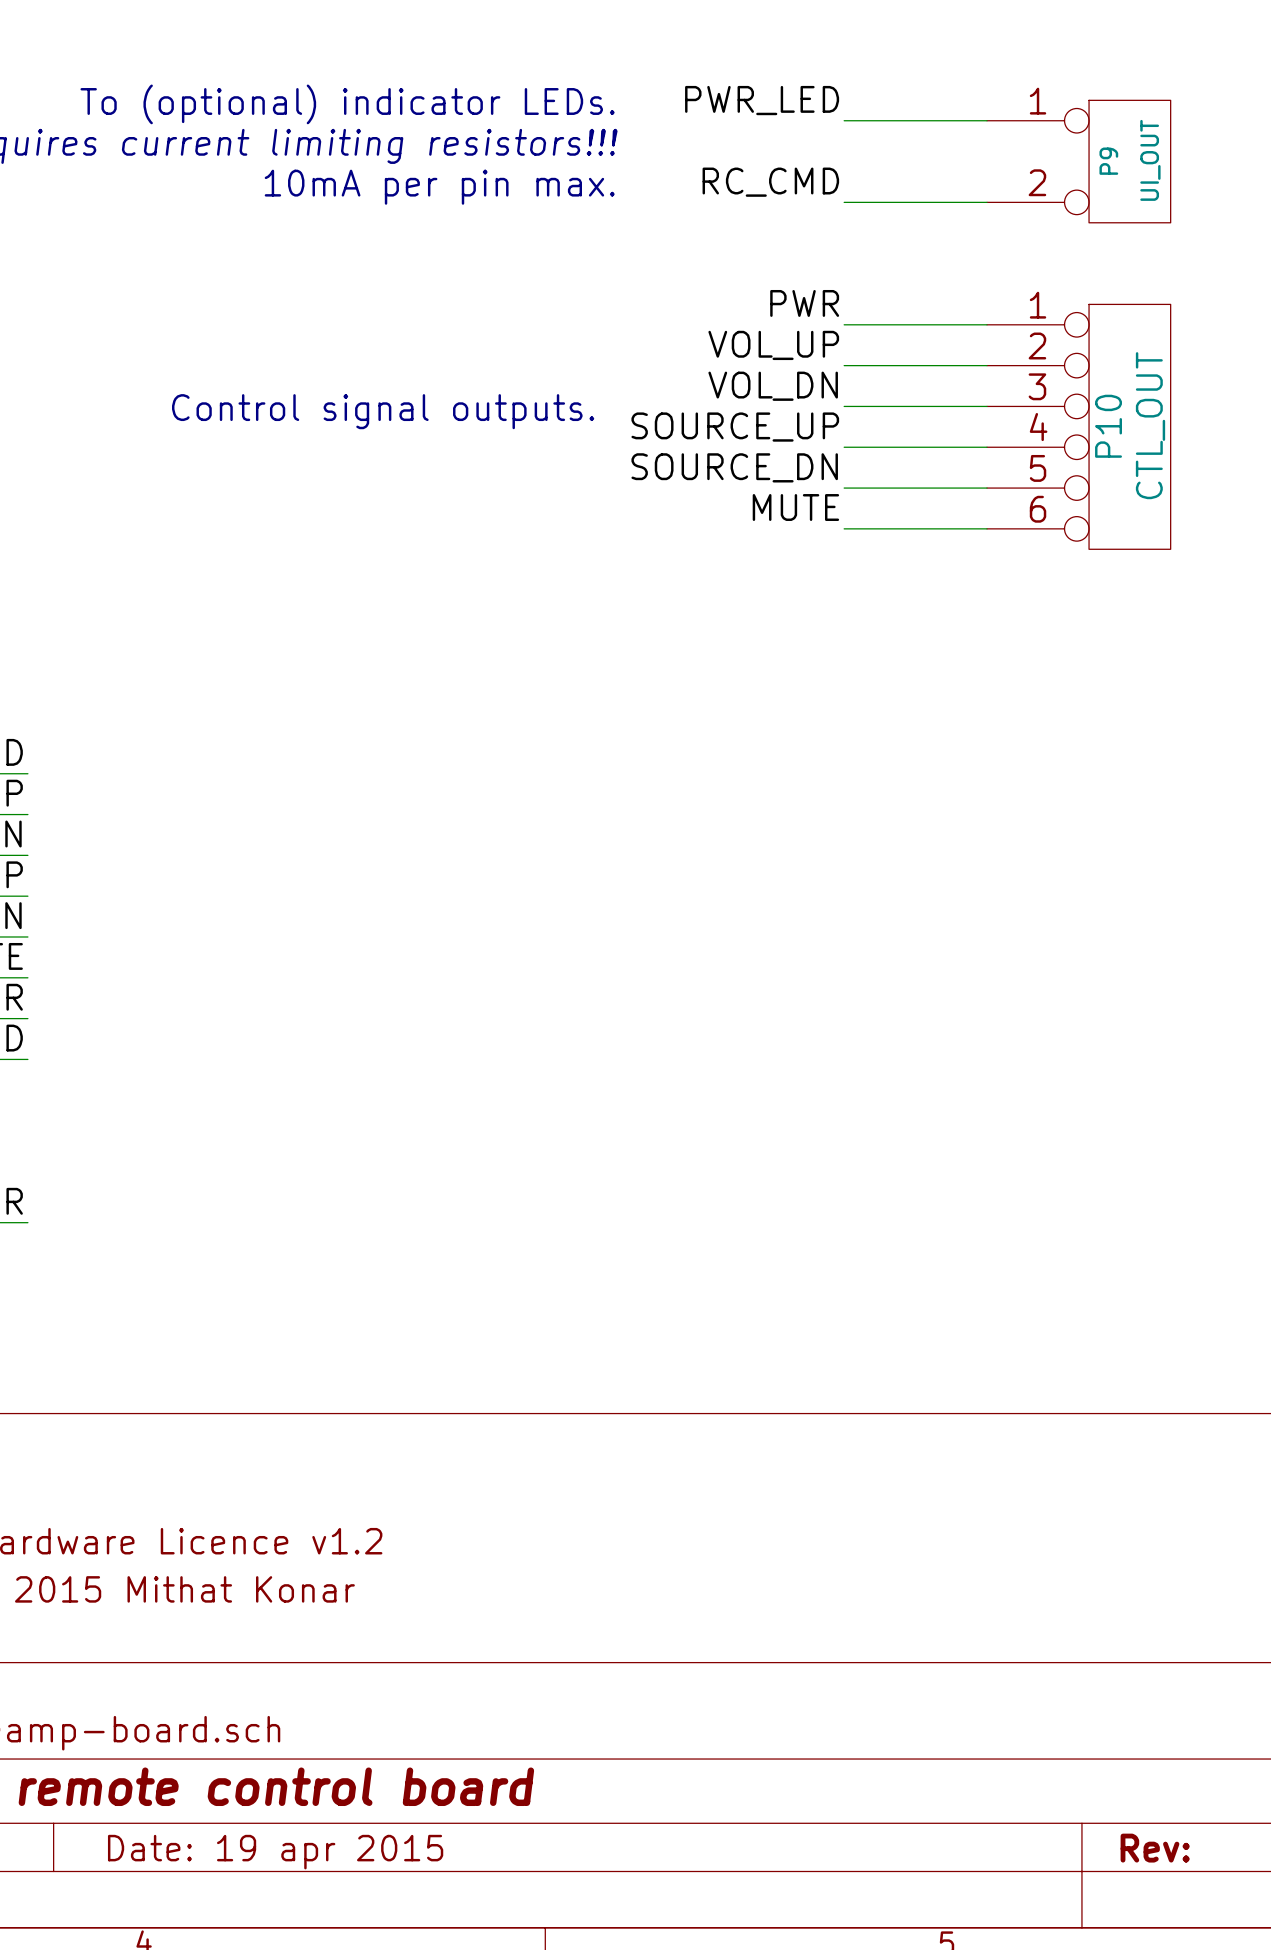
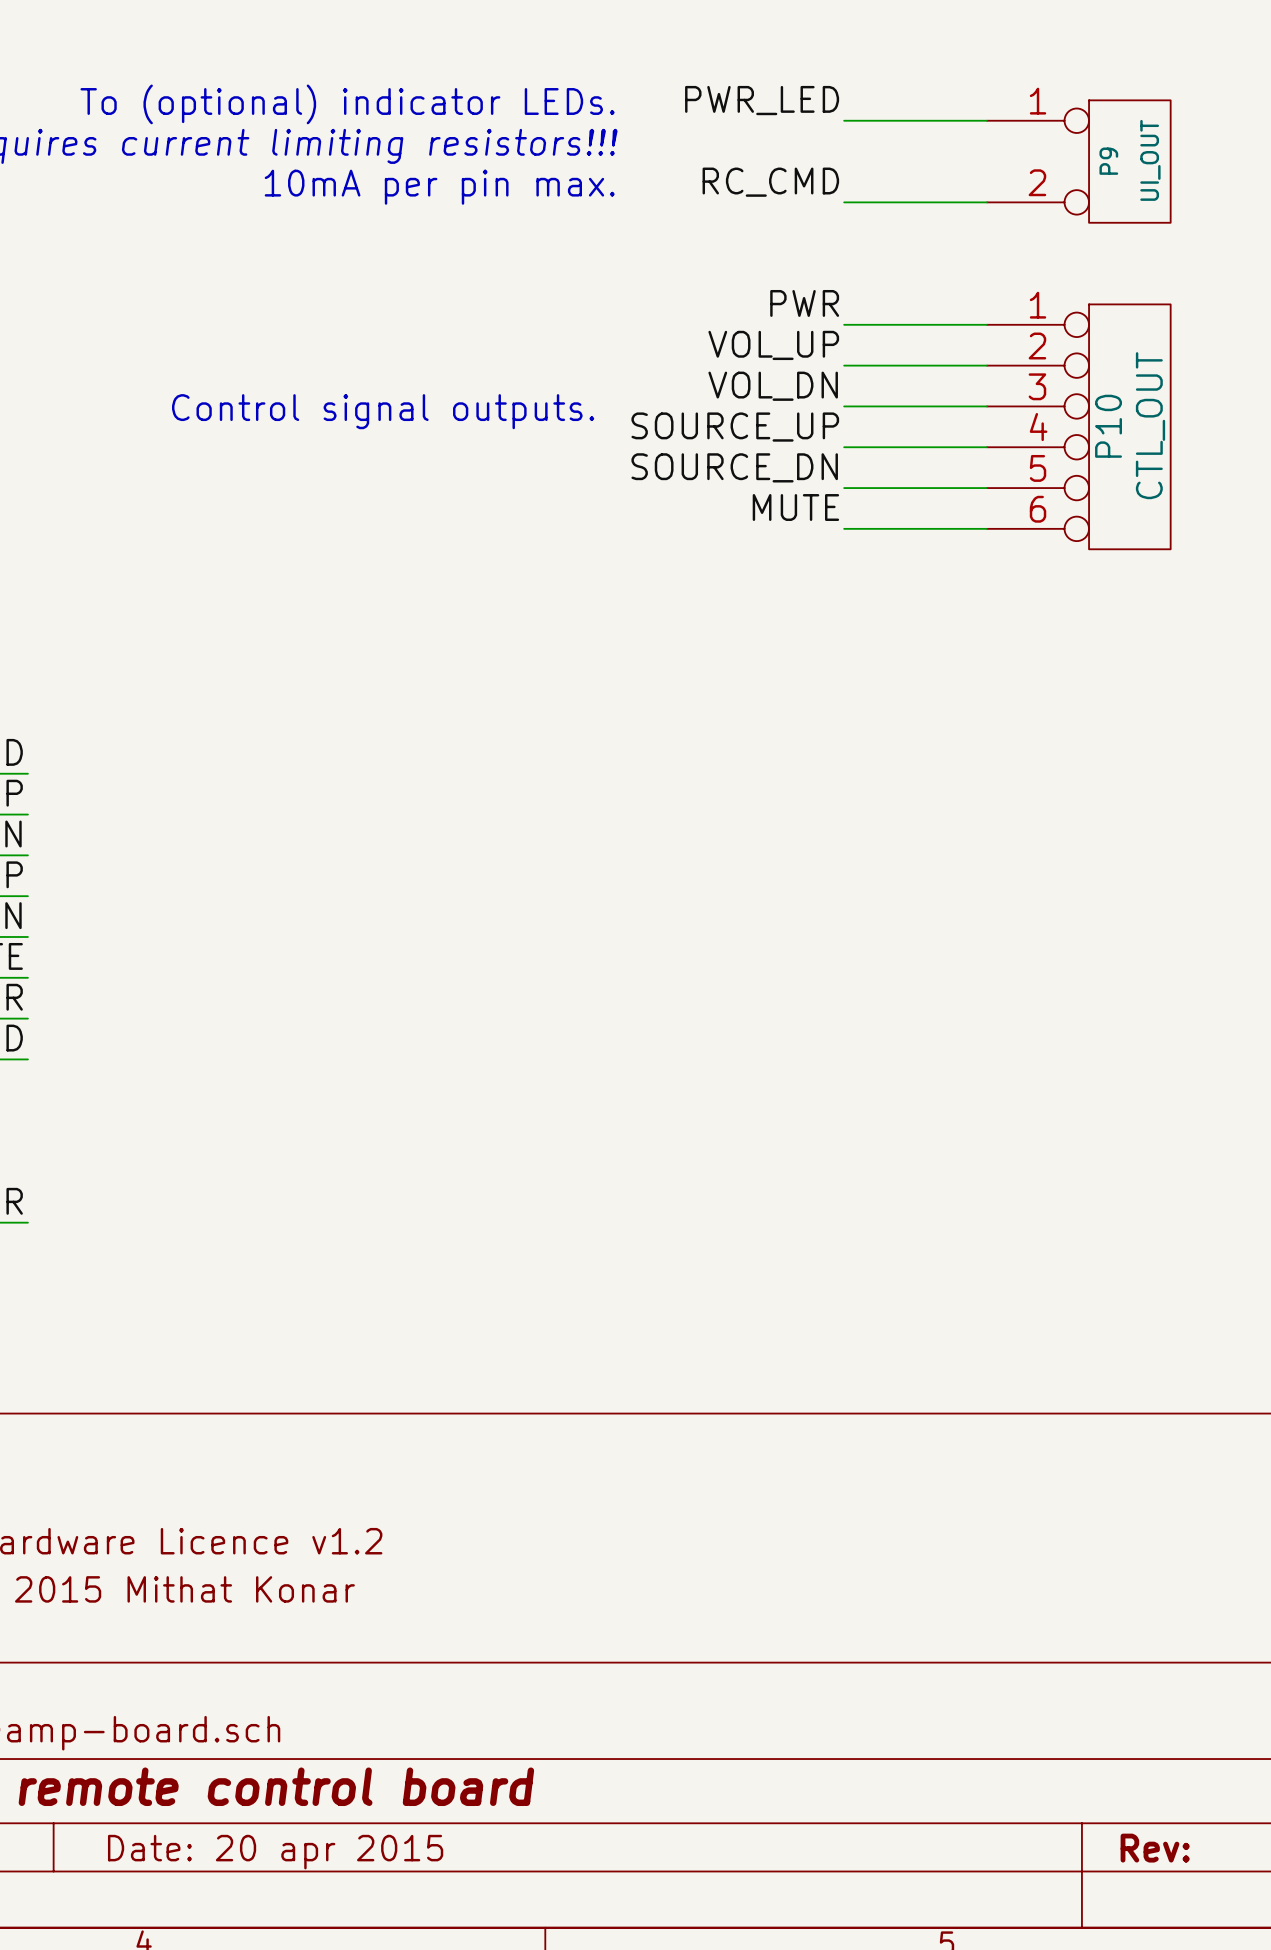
title block: Date: 19 apr 2015 (275, 1852) -> Date: 20 apr 2015 (275, 1852)

